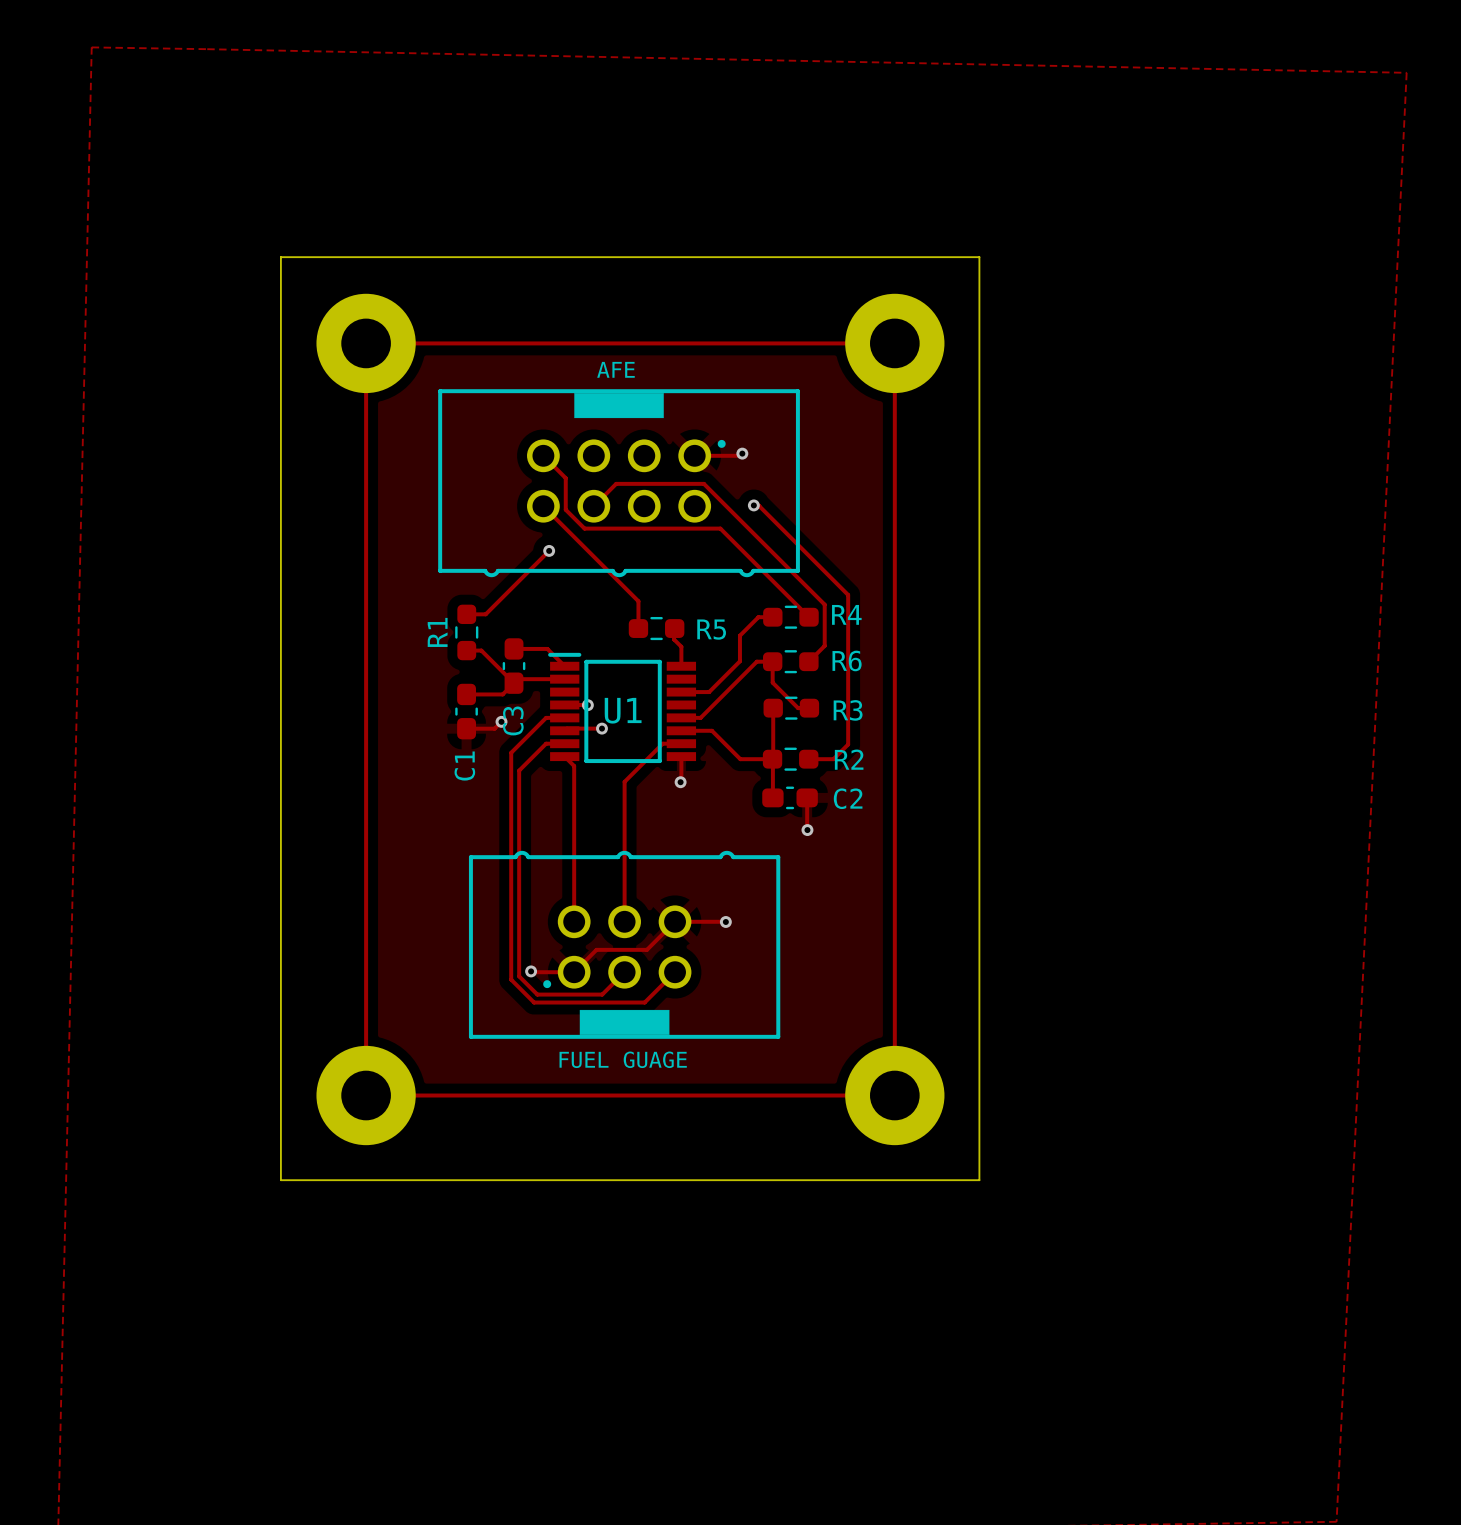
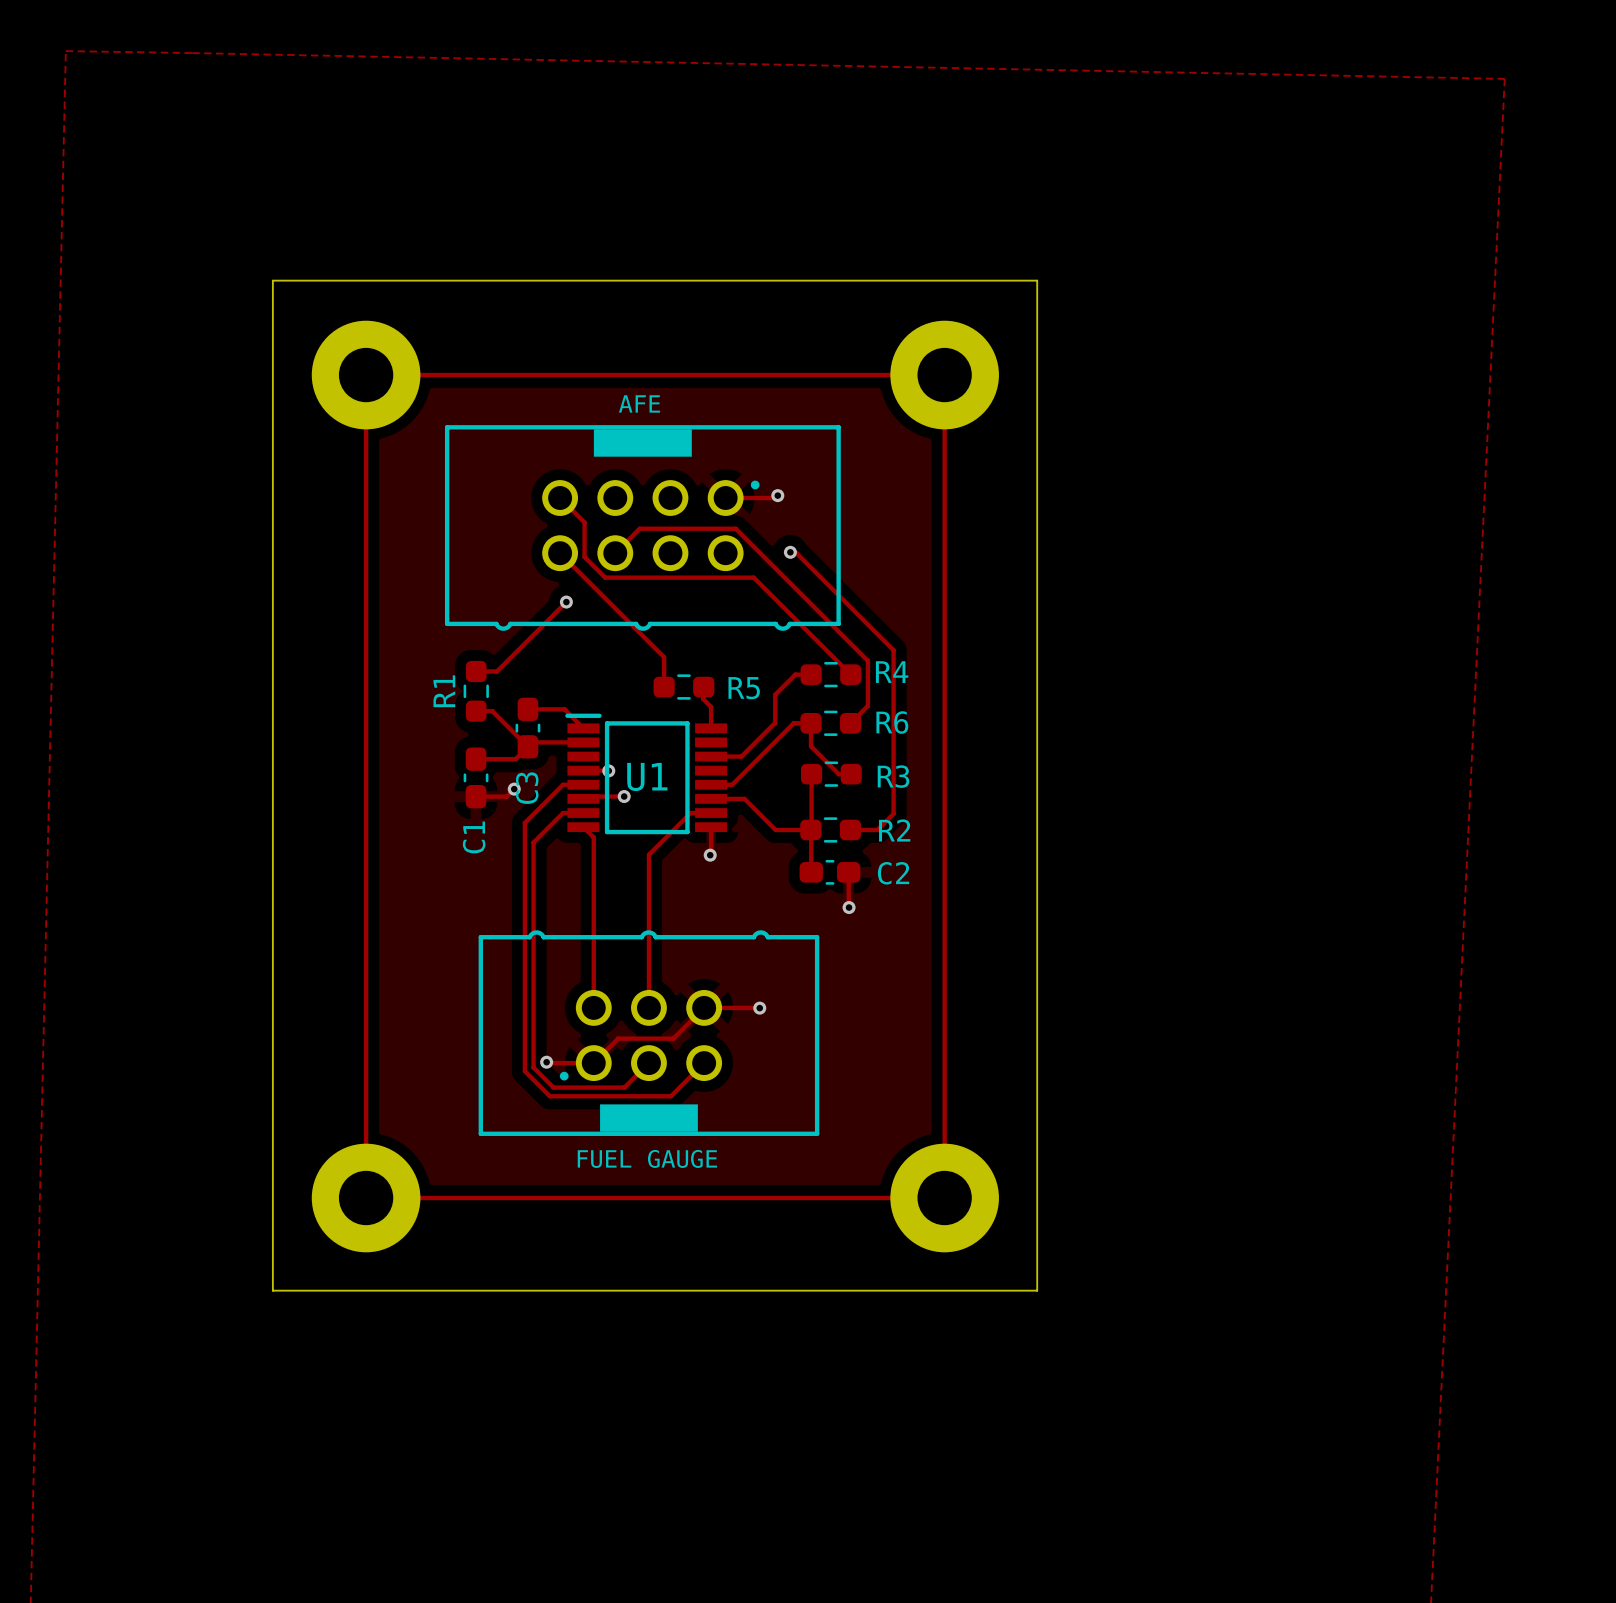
FUEL GUAGE name: FUEL GUAGE (623, 1059) -> FUEL GAUGE (647, 1158)

